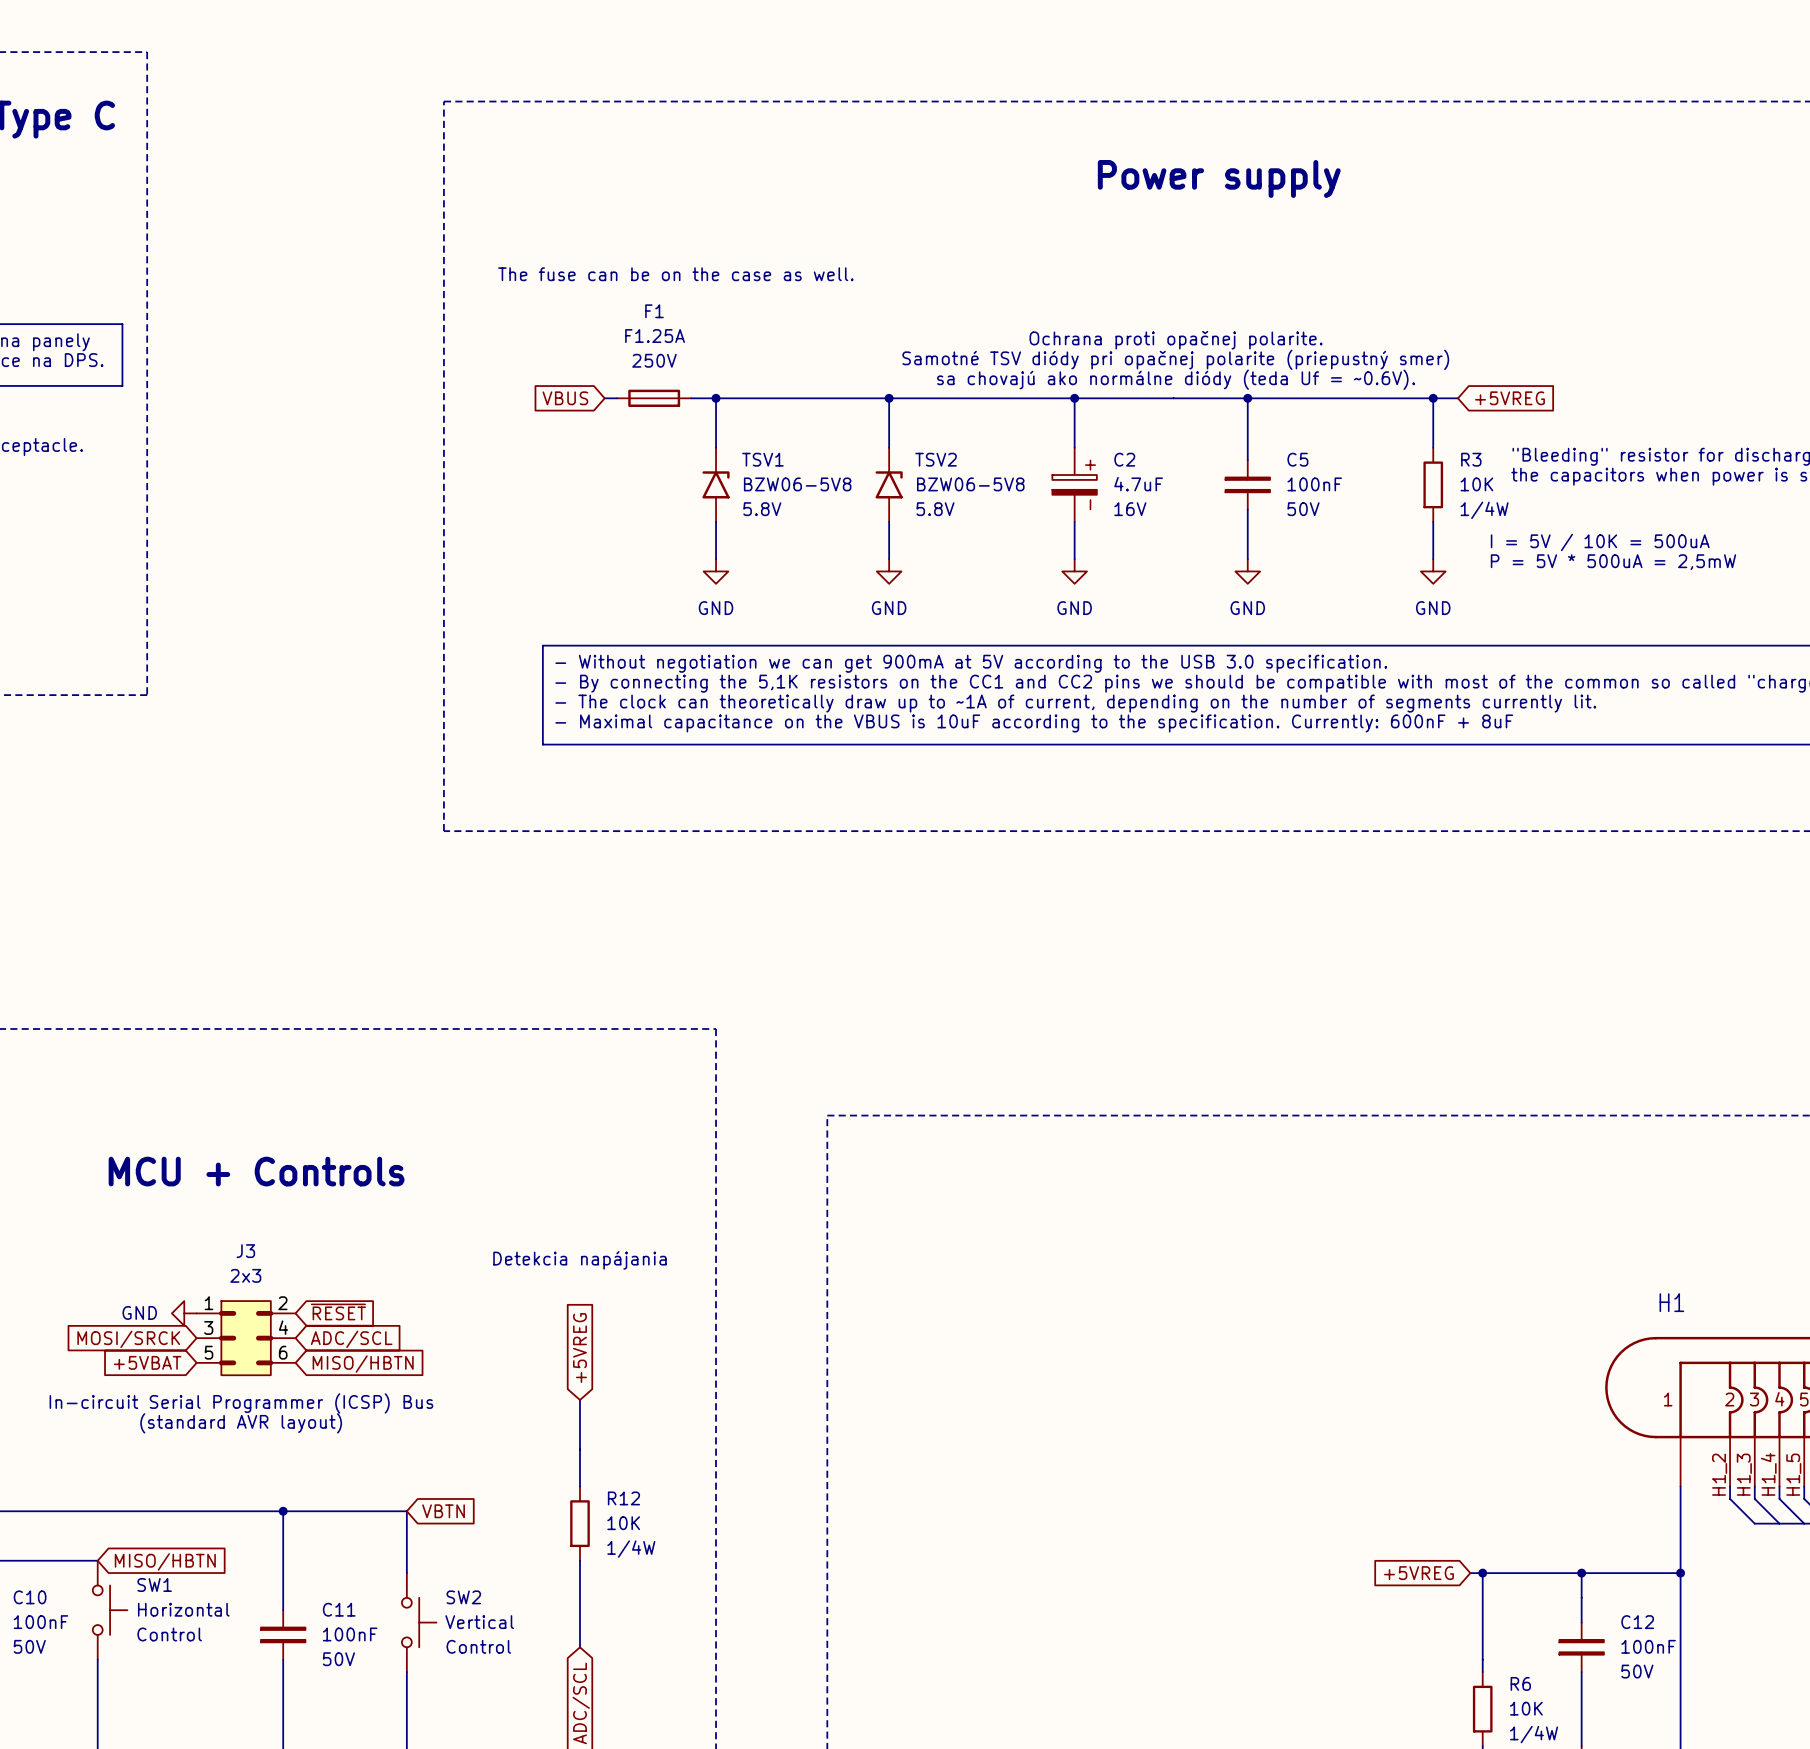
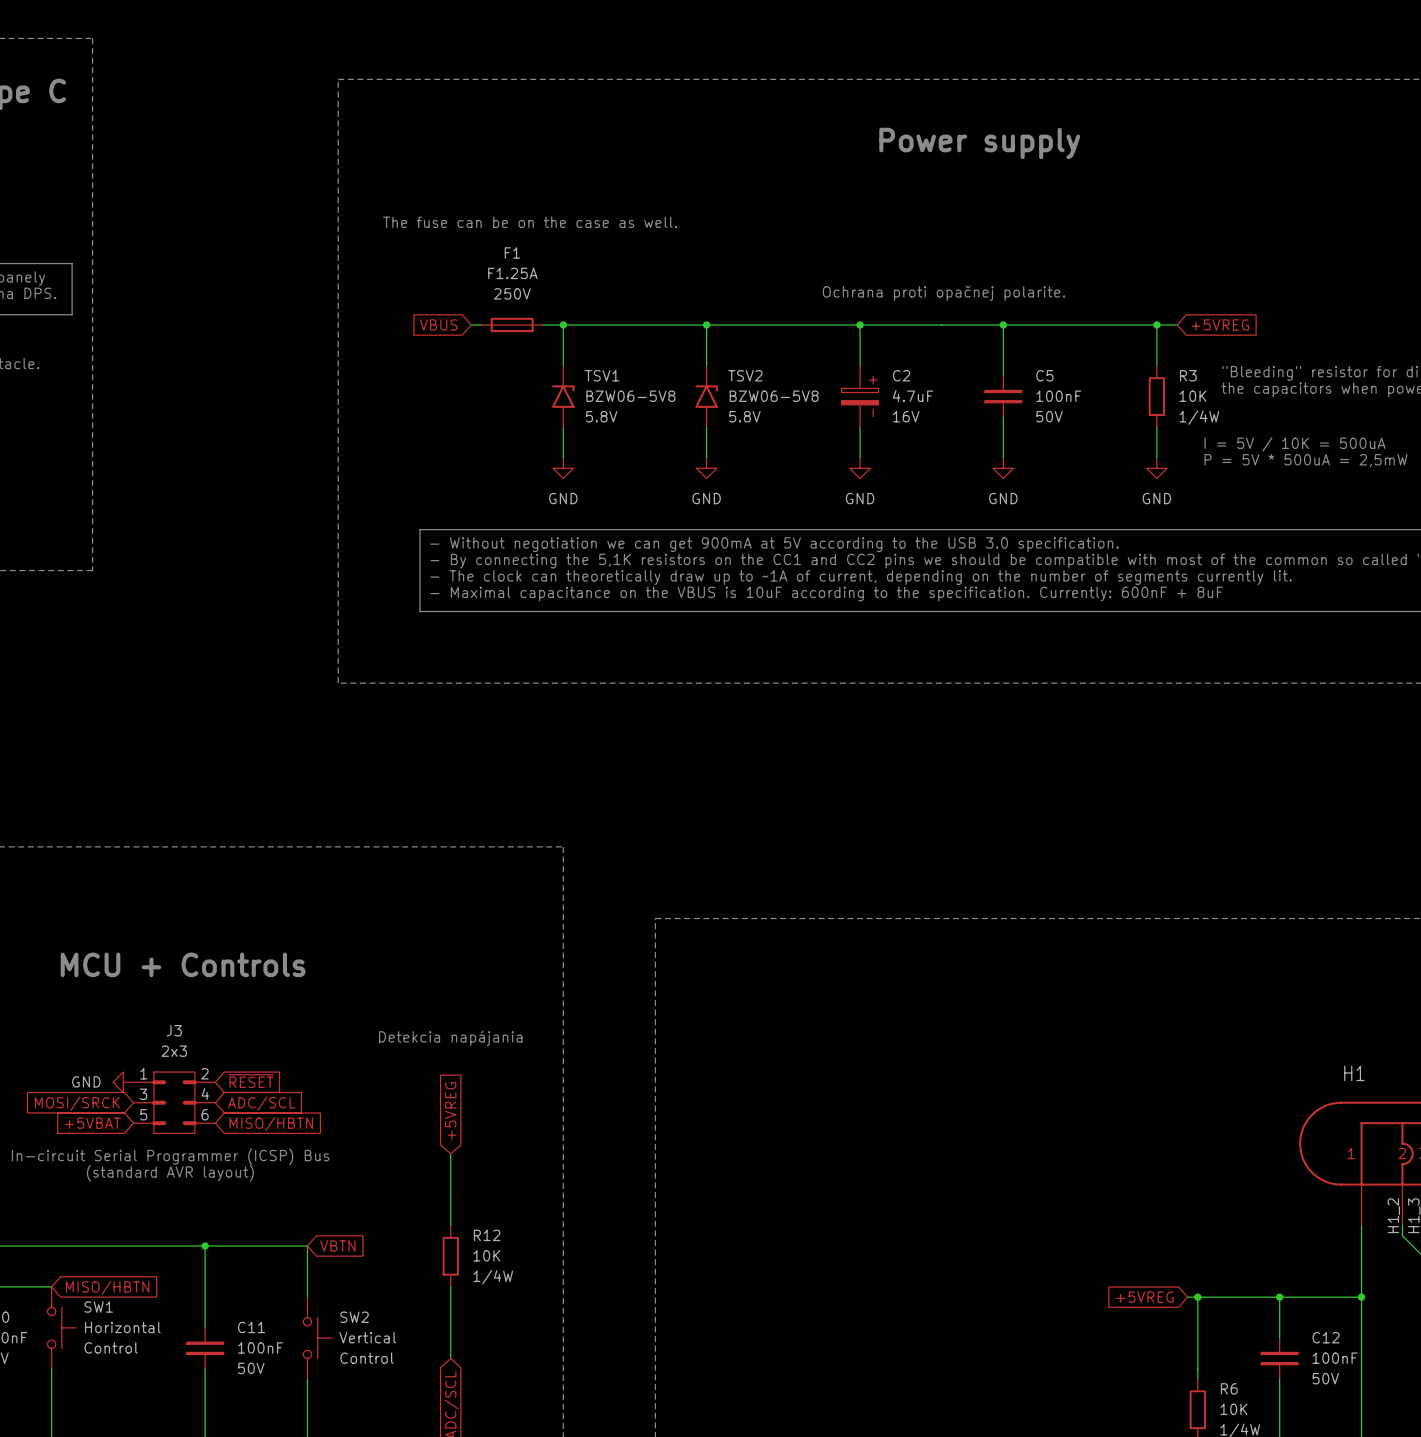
text: Ochrana proti opačnej polarite. (1176, 340) -> none
text: Samotné TSV diódy pri opačnej polarite (priepustný smer) (1175, 359) -> Ochrana proti opačnej polarite. (944, 293)
text: sa chovajú ako normálne diódy (teda Uf = ~0.6V). (1176, 379) -> none

